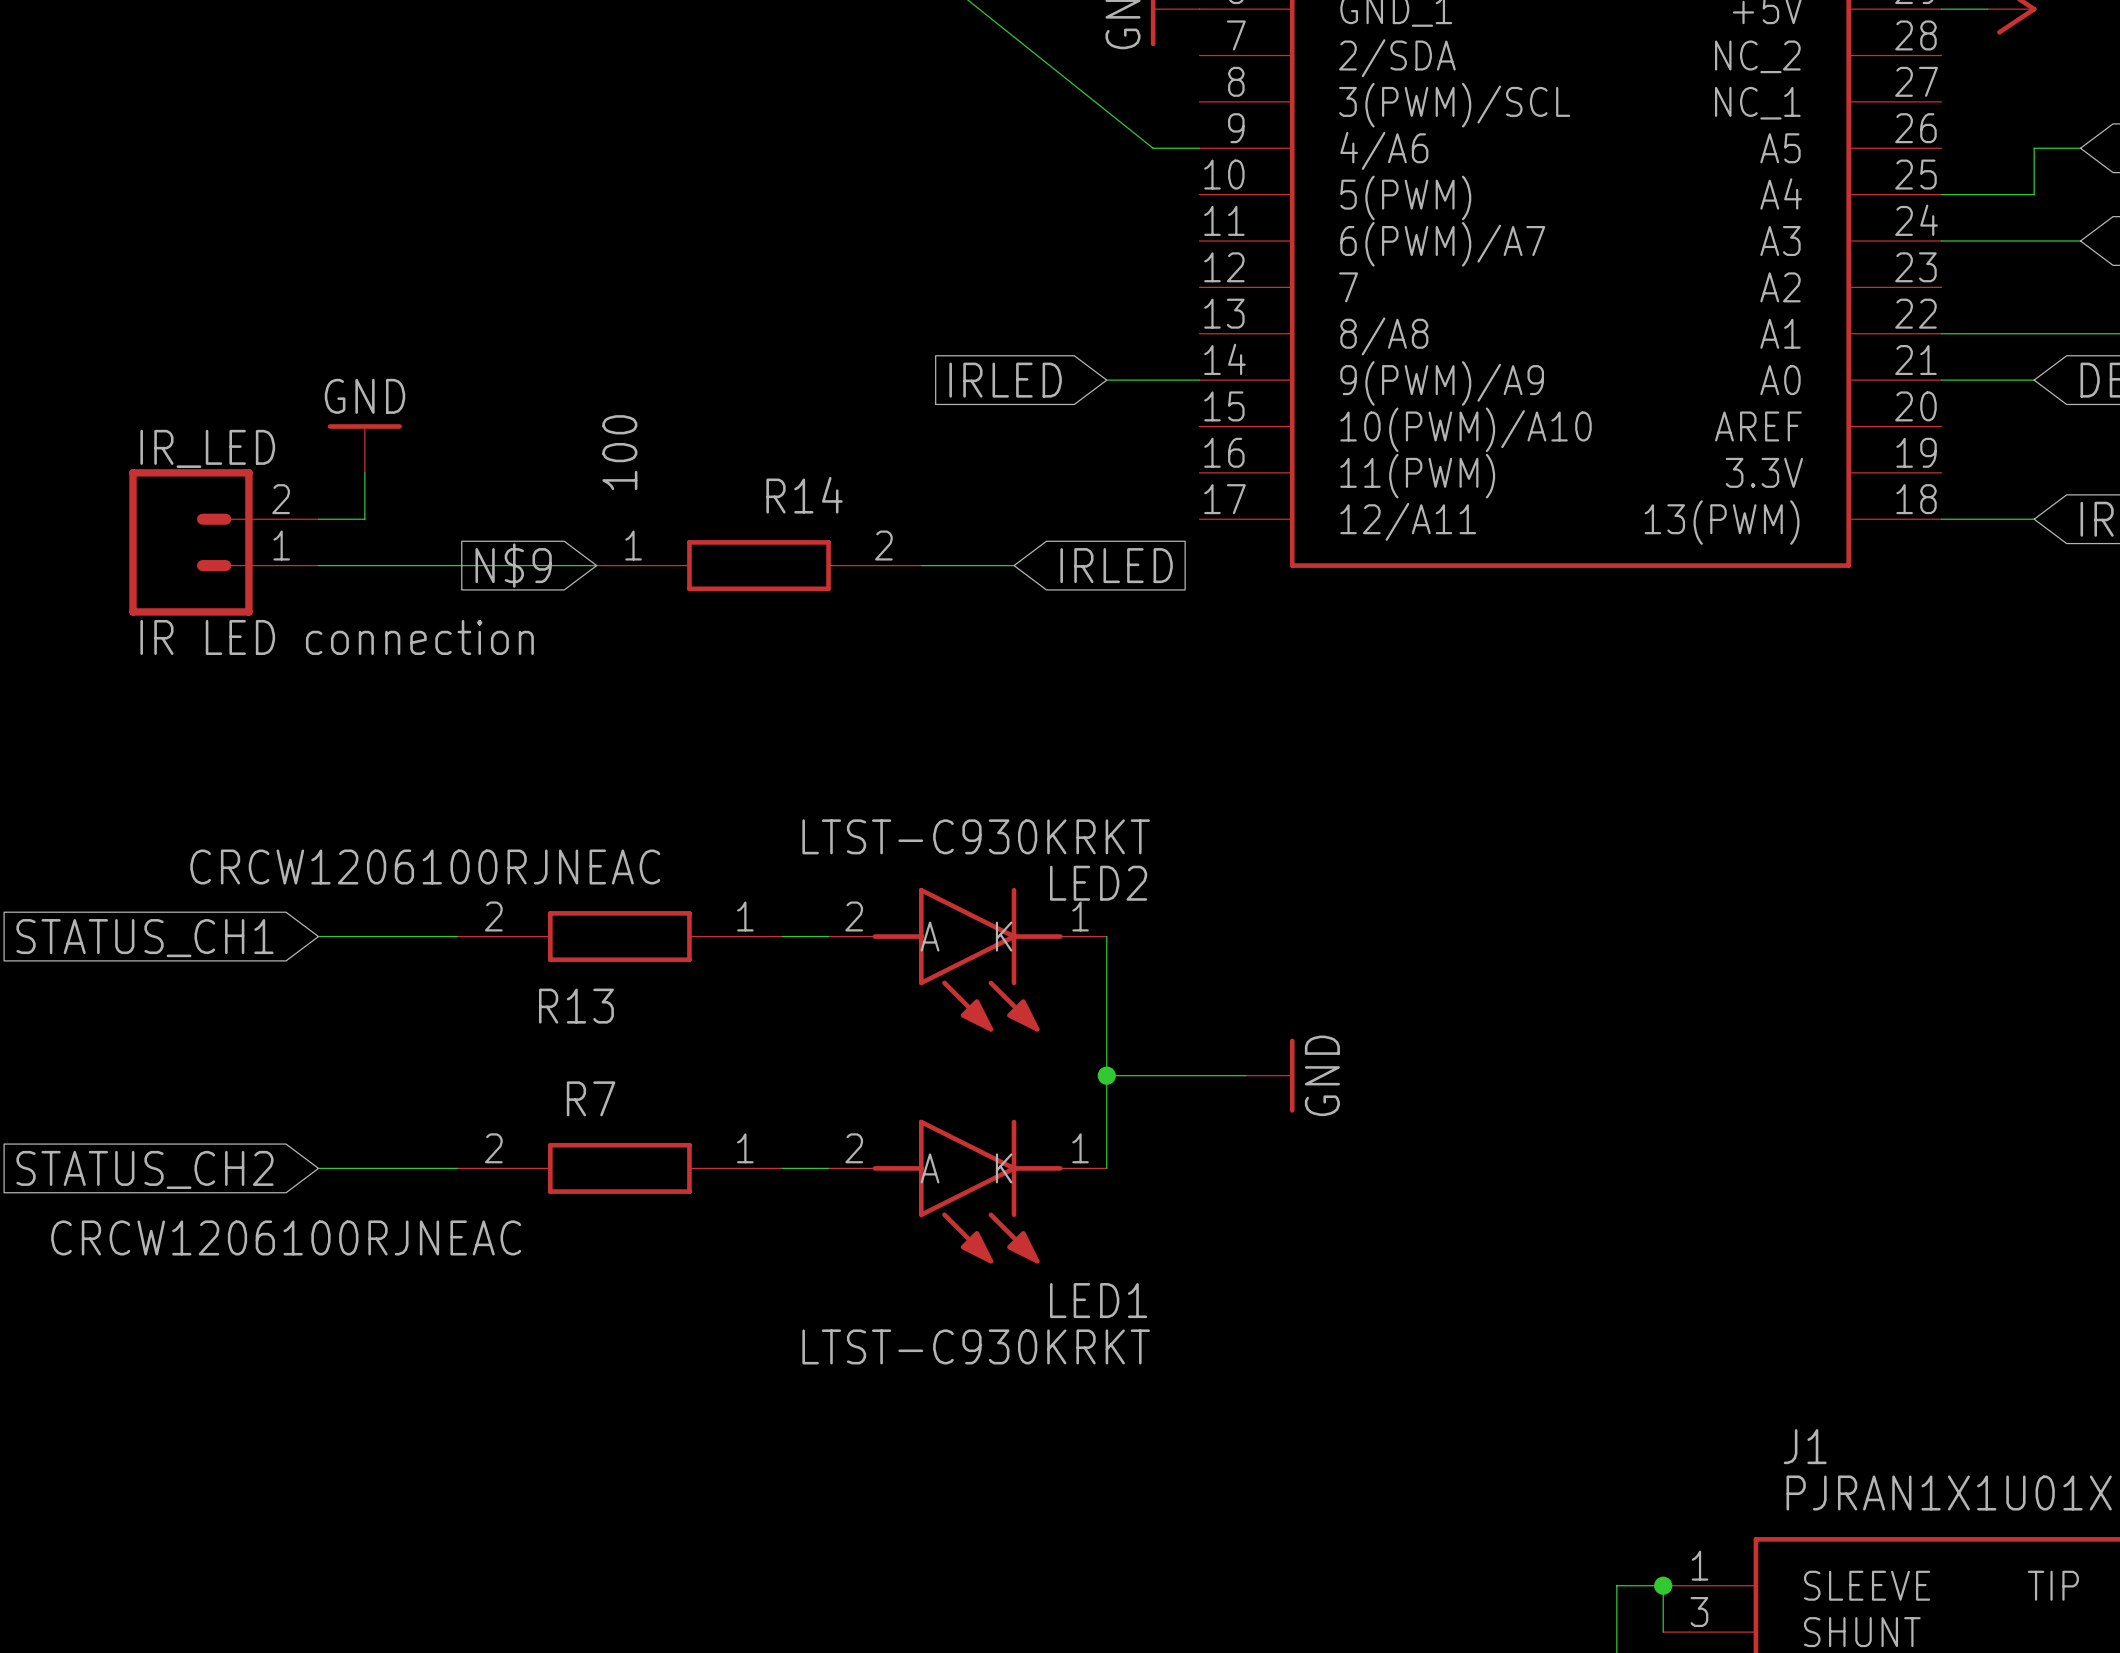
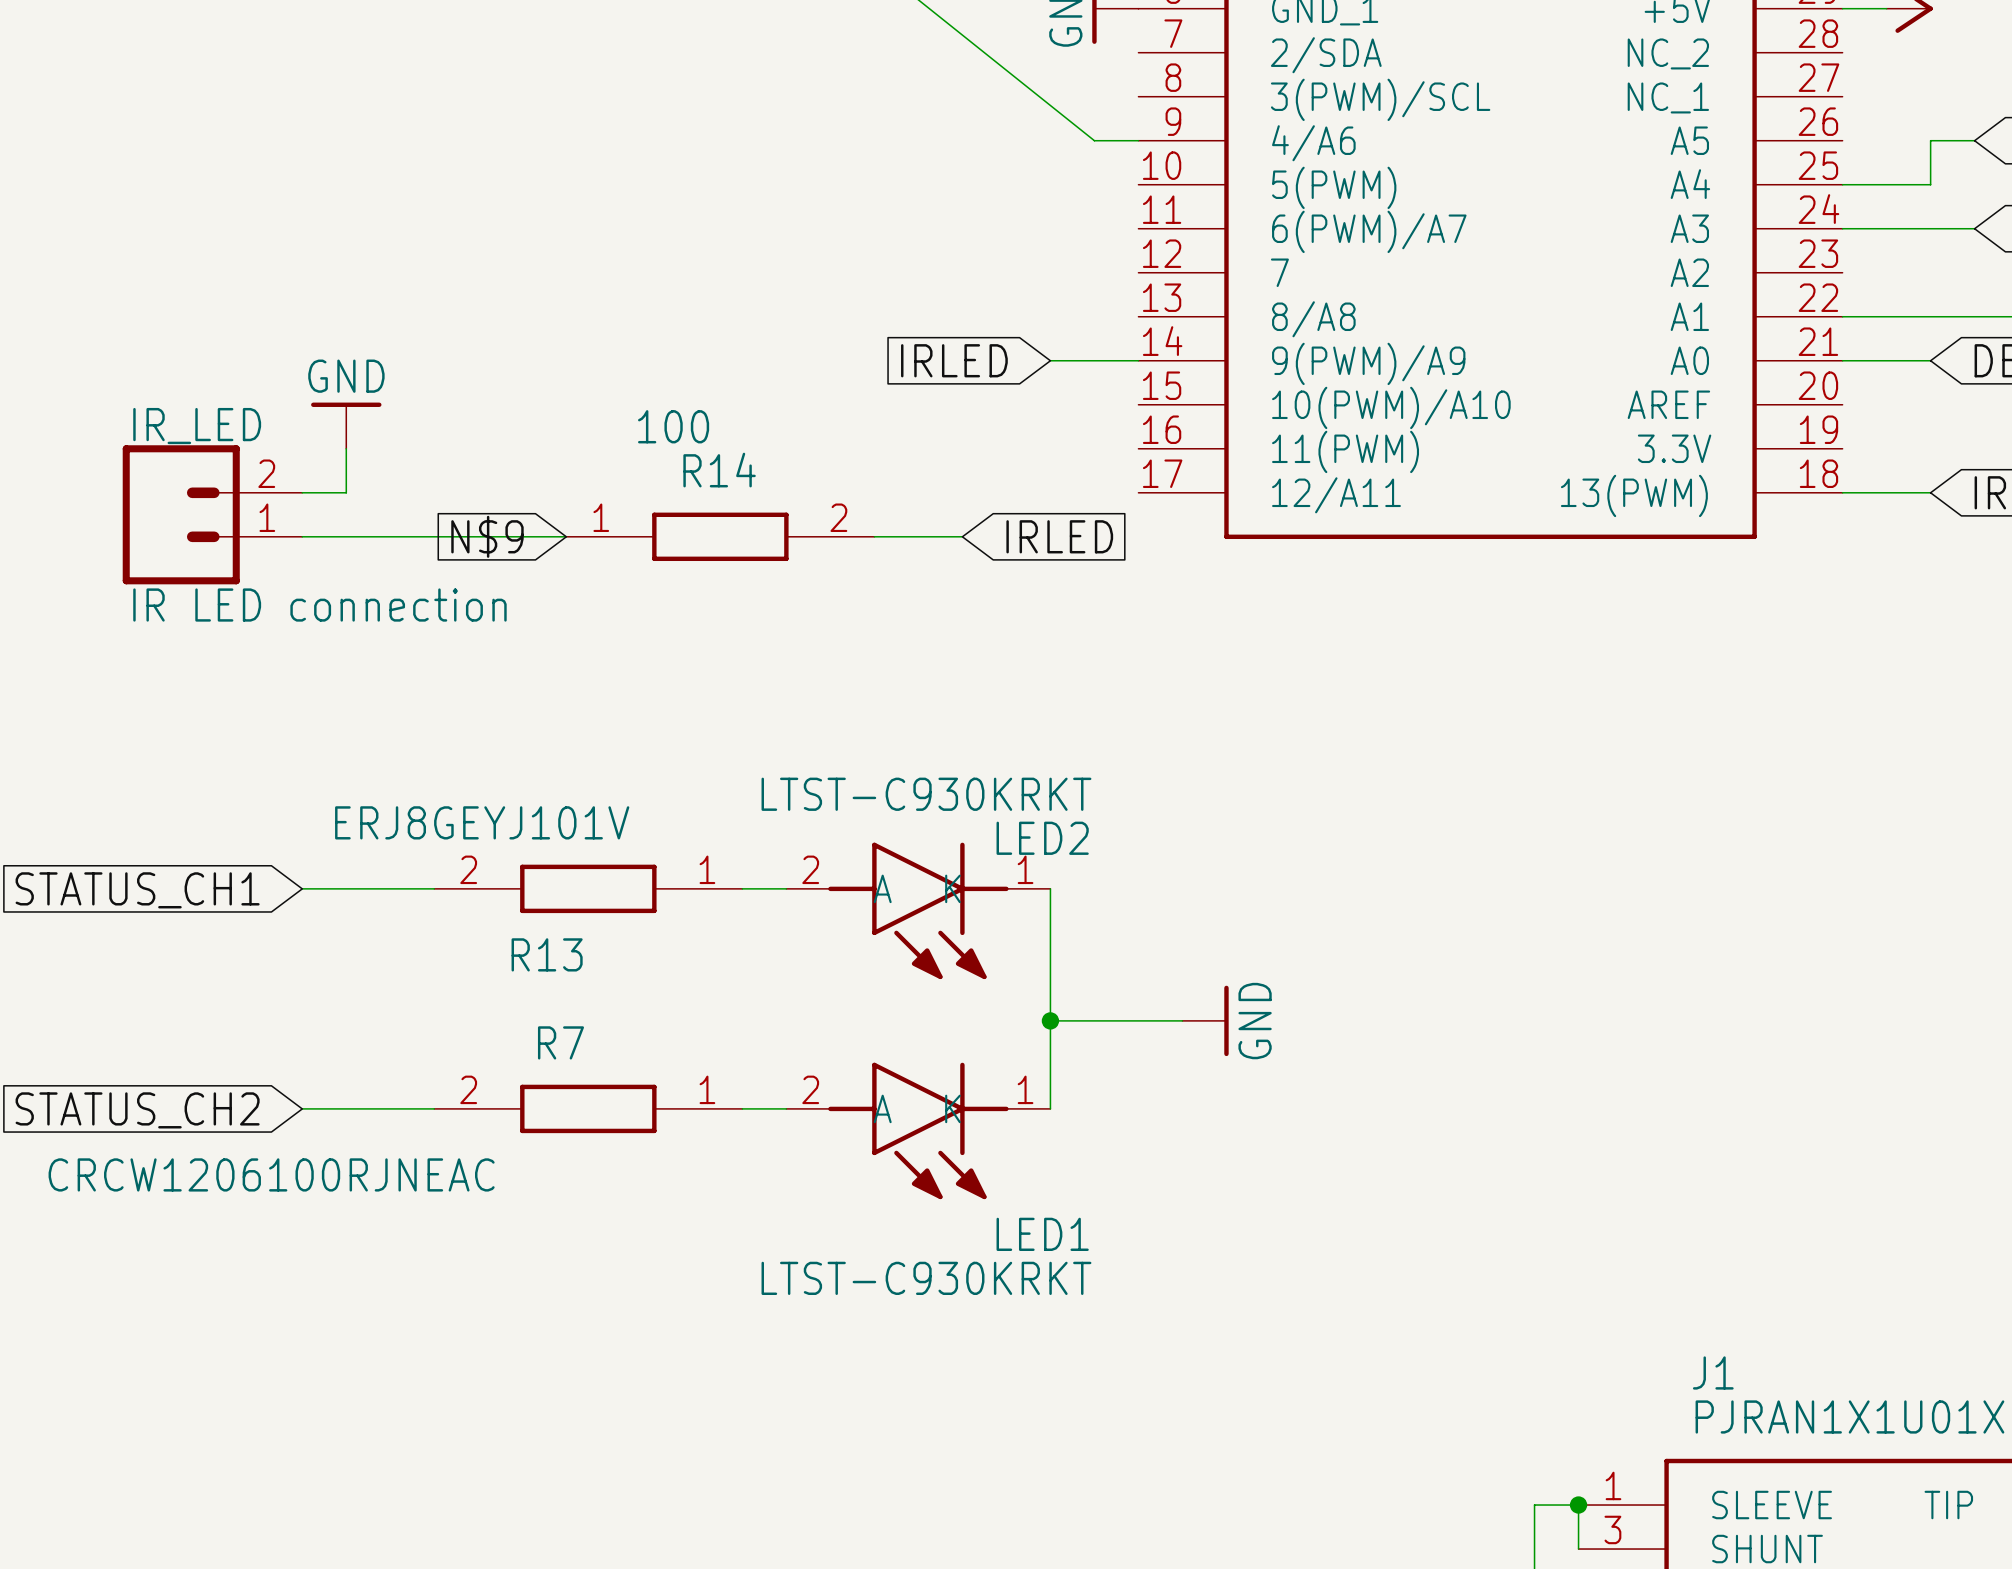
R14 value rotation: 0° (619, 452) -> 90° clockwise (673, 426)
R14 name position: R14 (804, 495) -> R14 (719, 470)
R13 value: CRCW1206100RJNEAC (425, 867) -> ERJ8GEYJ101V (482, 822)

